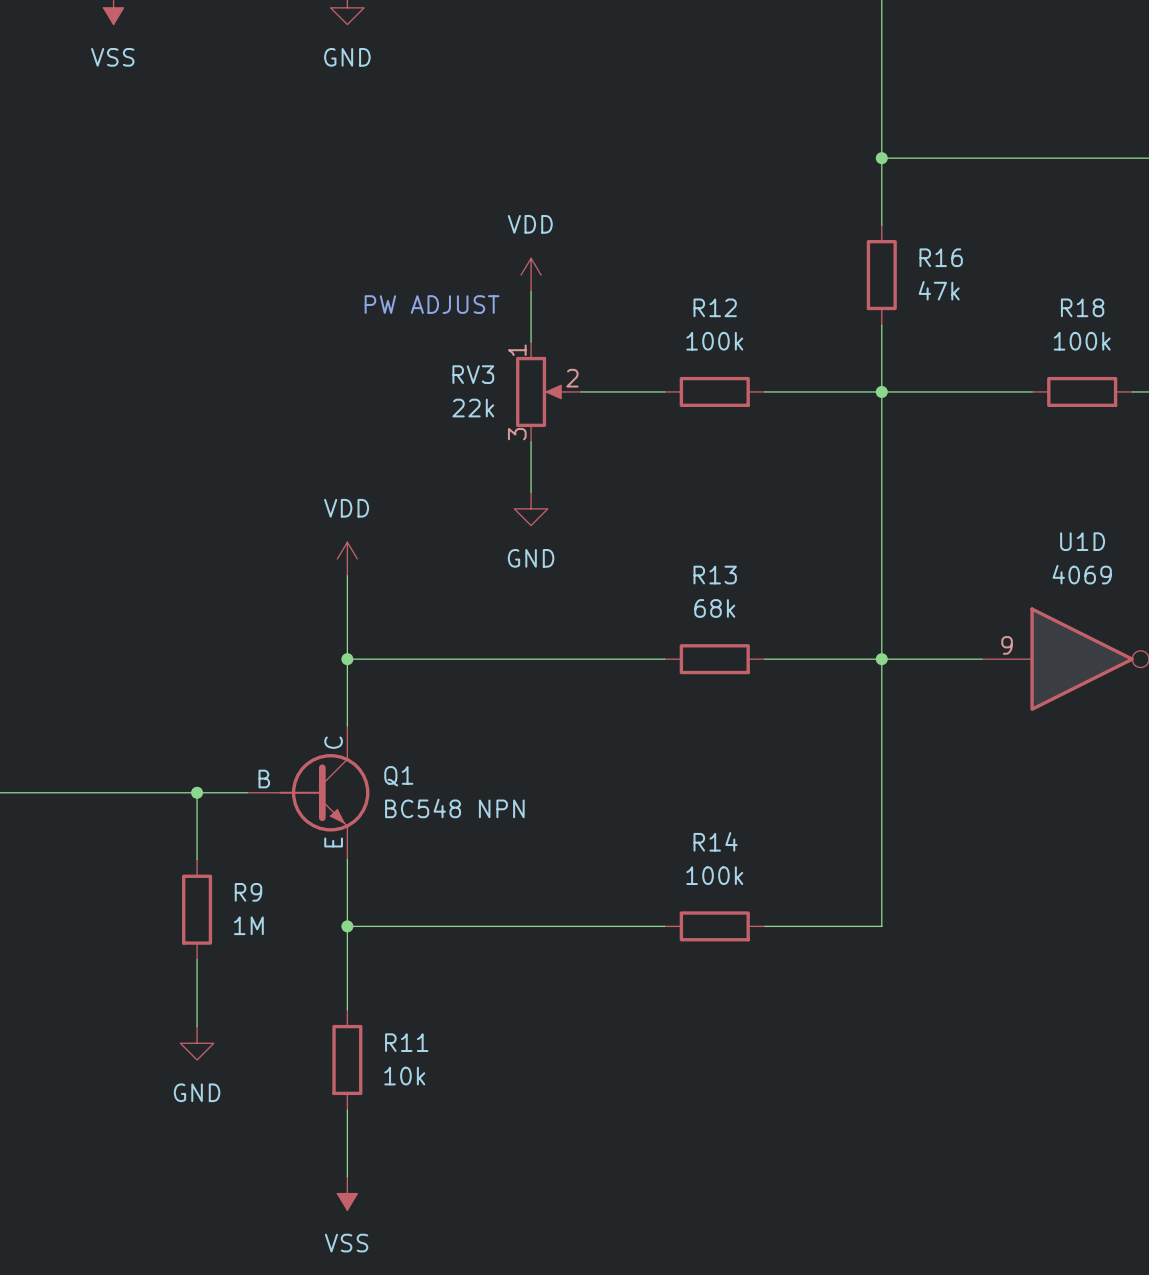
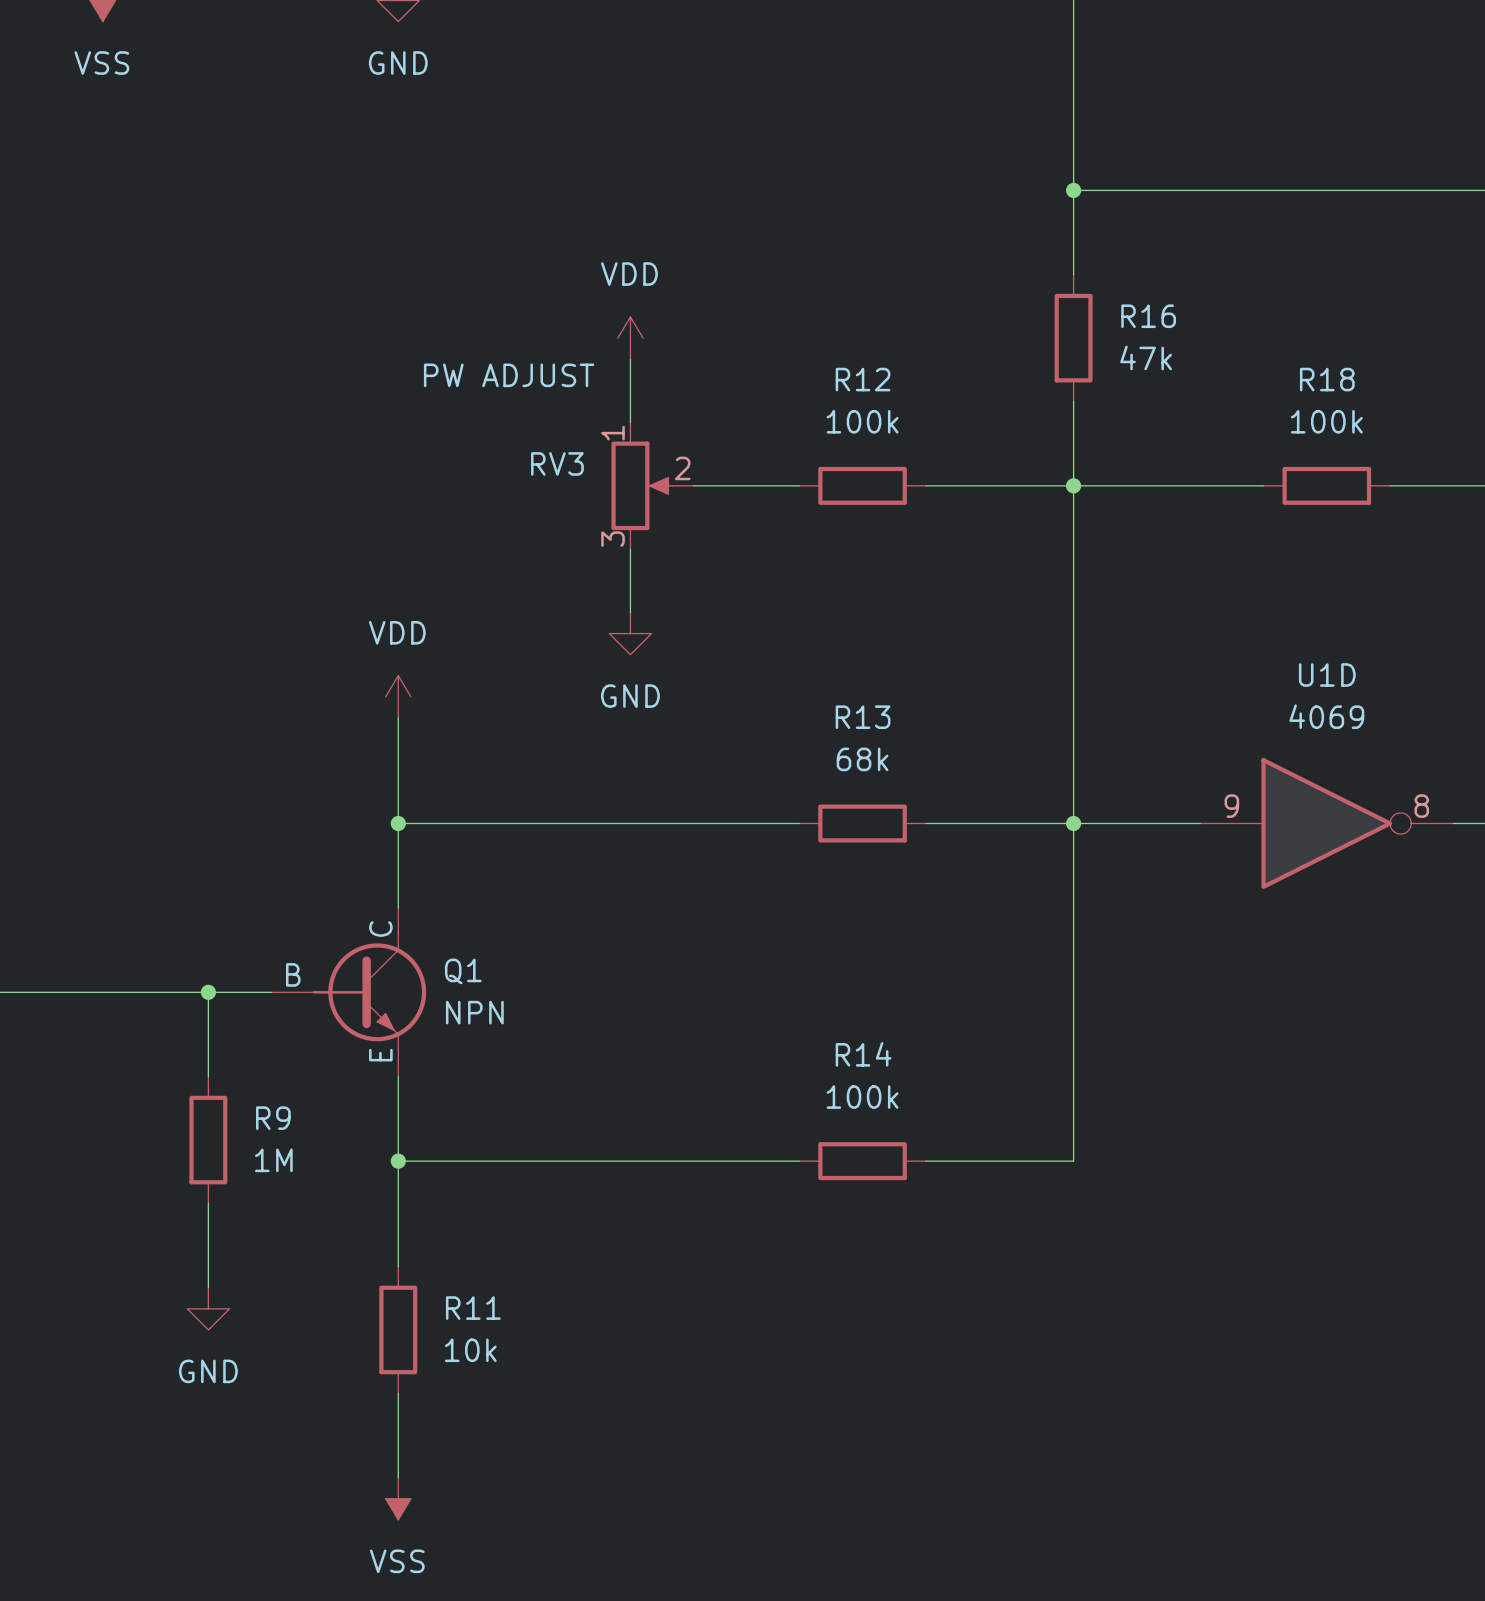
text: PW ADJUST (432, 304) -> none
RV3 value: 22k (473, 408) -> PW ADJUST (509, 375)
Q1 value: BC548 NPN (454, 808) -> NPN (474, 1012)

